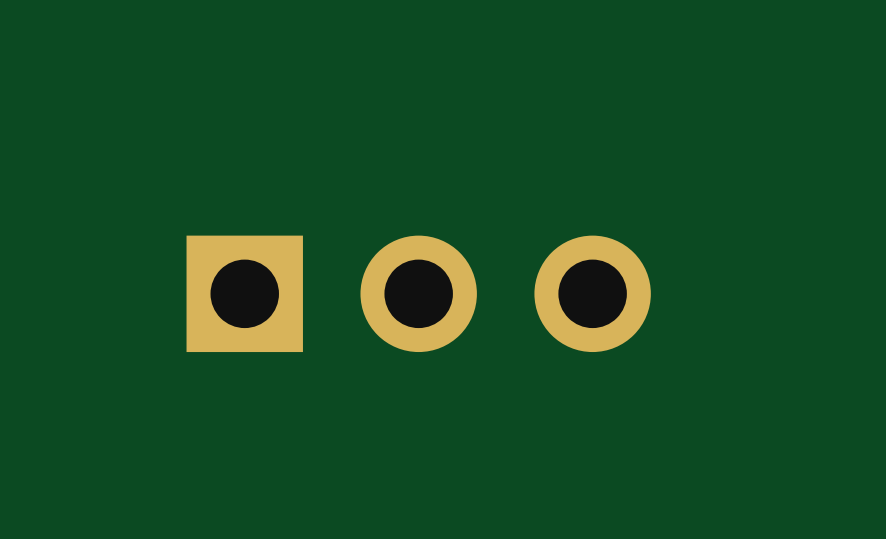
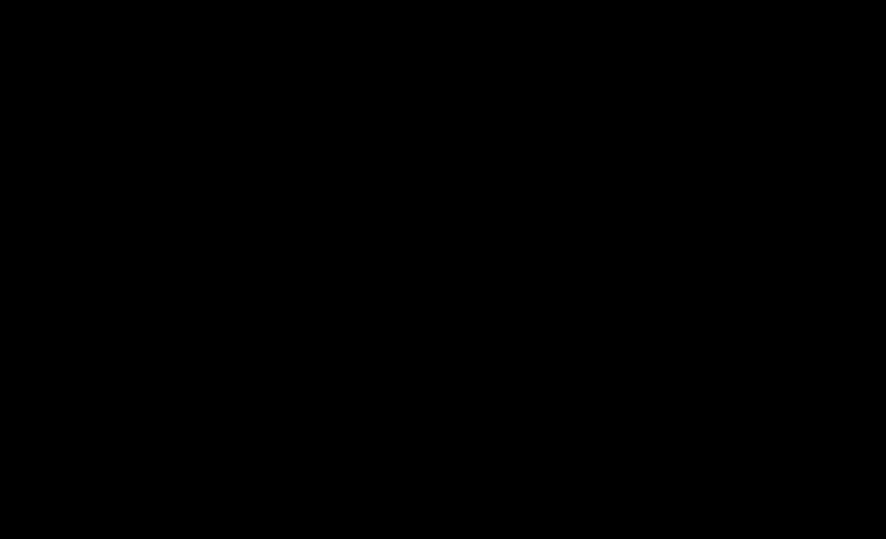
part: (418, 293) -> none

